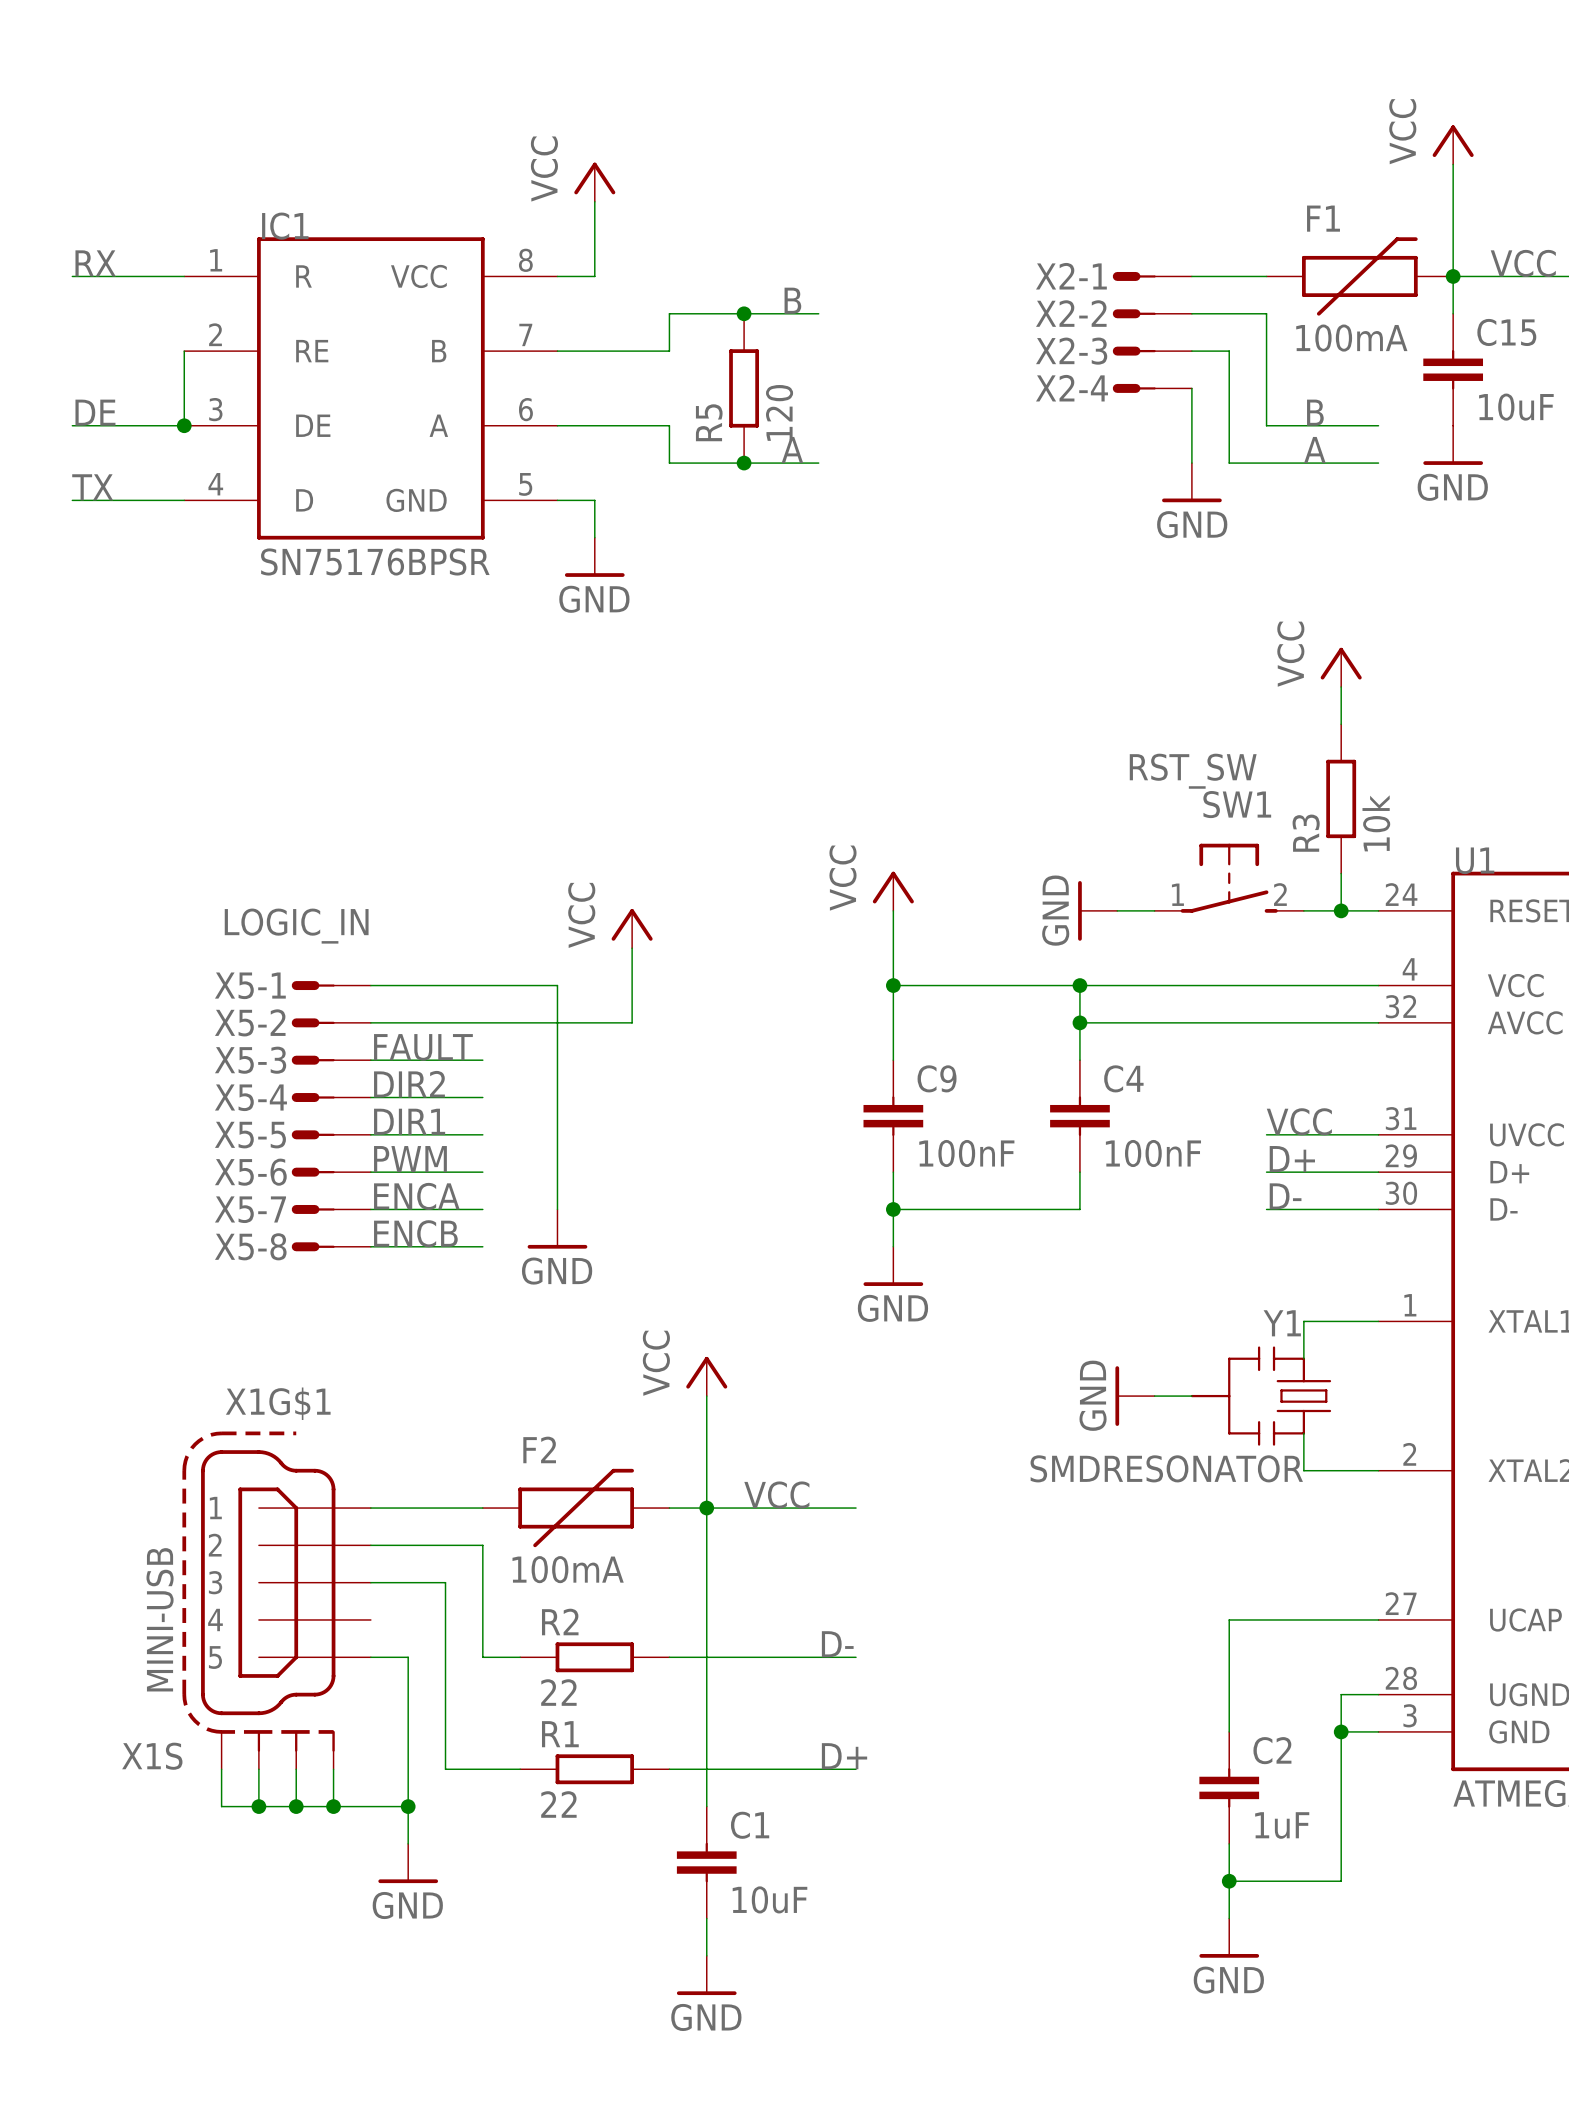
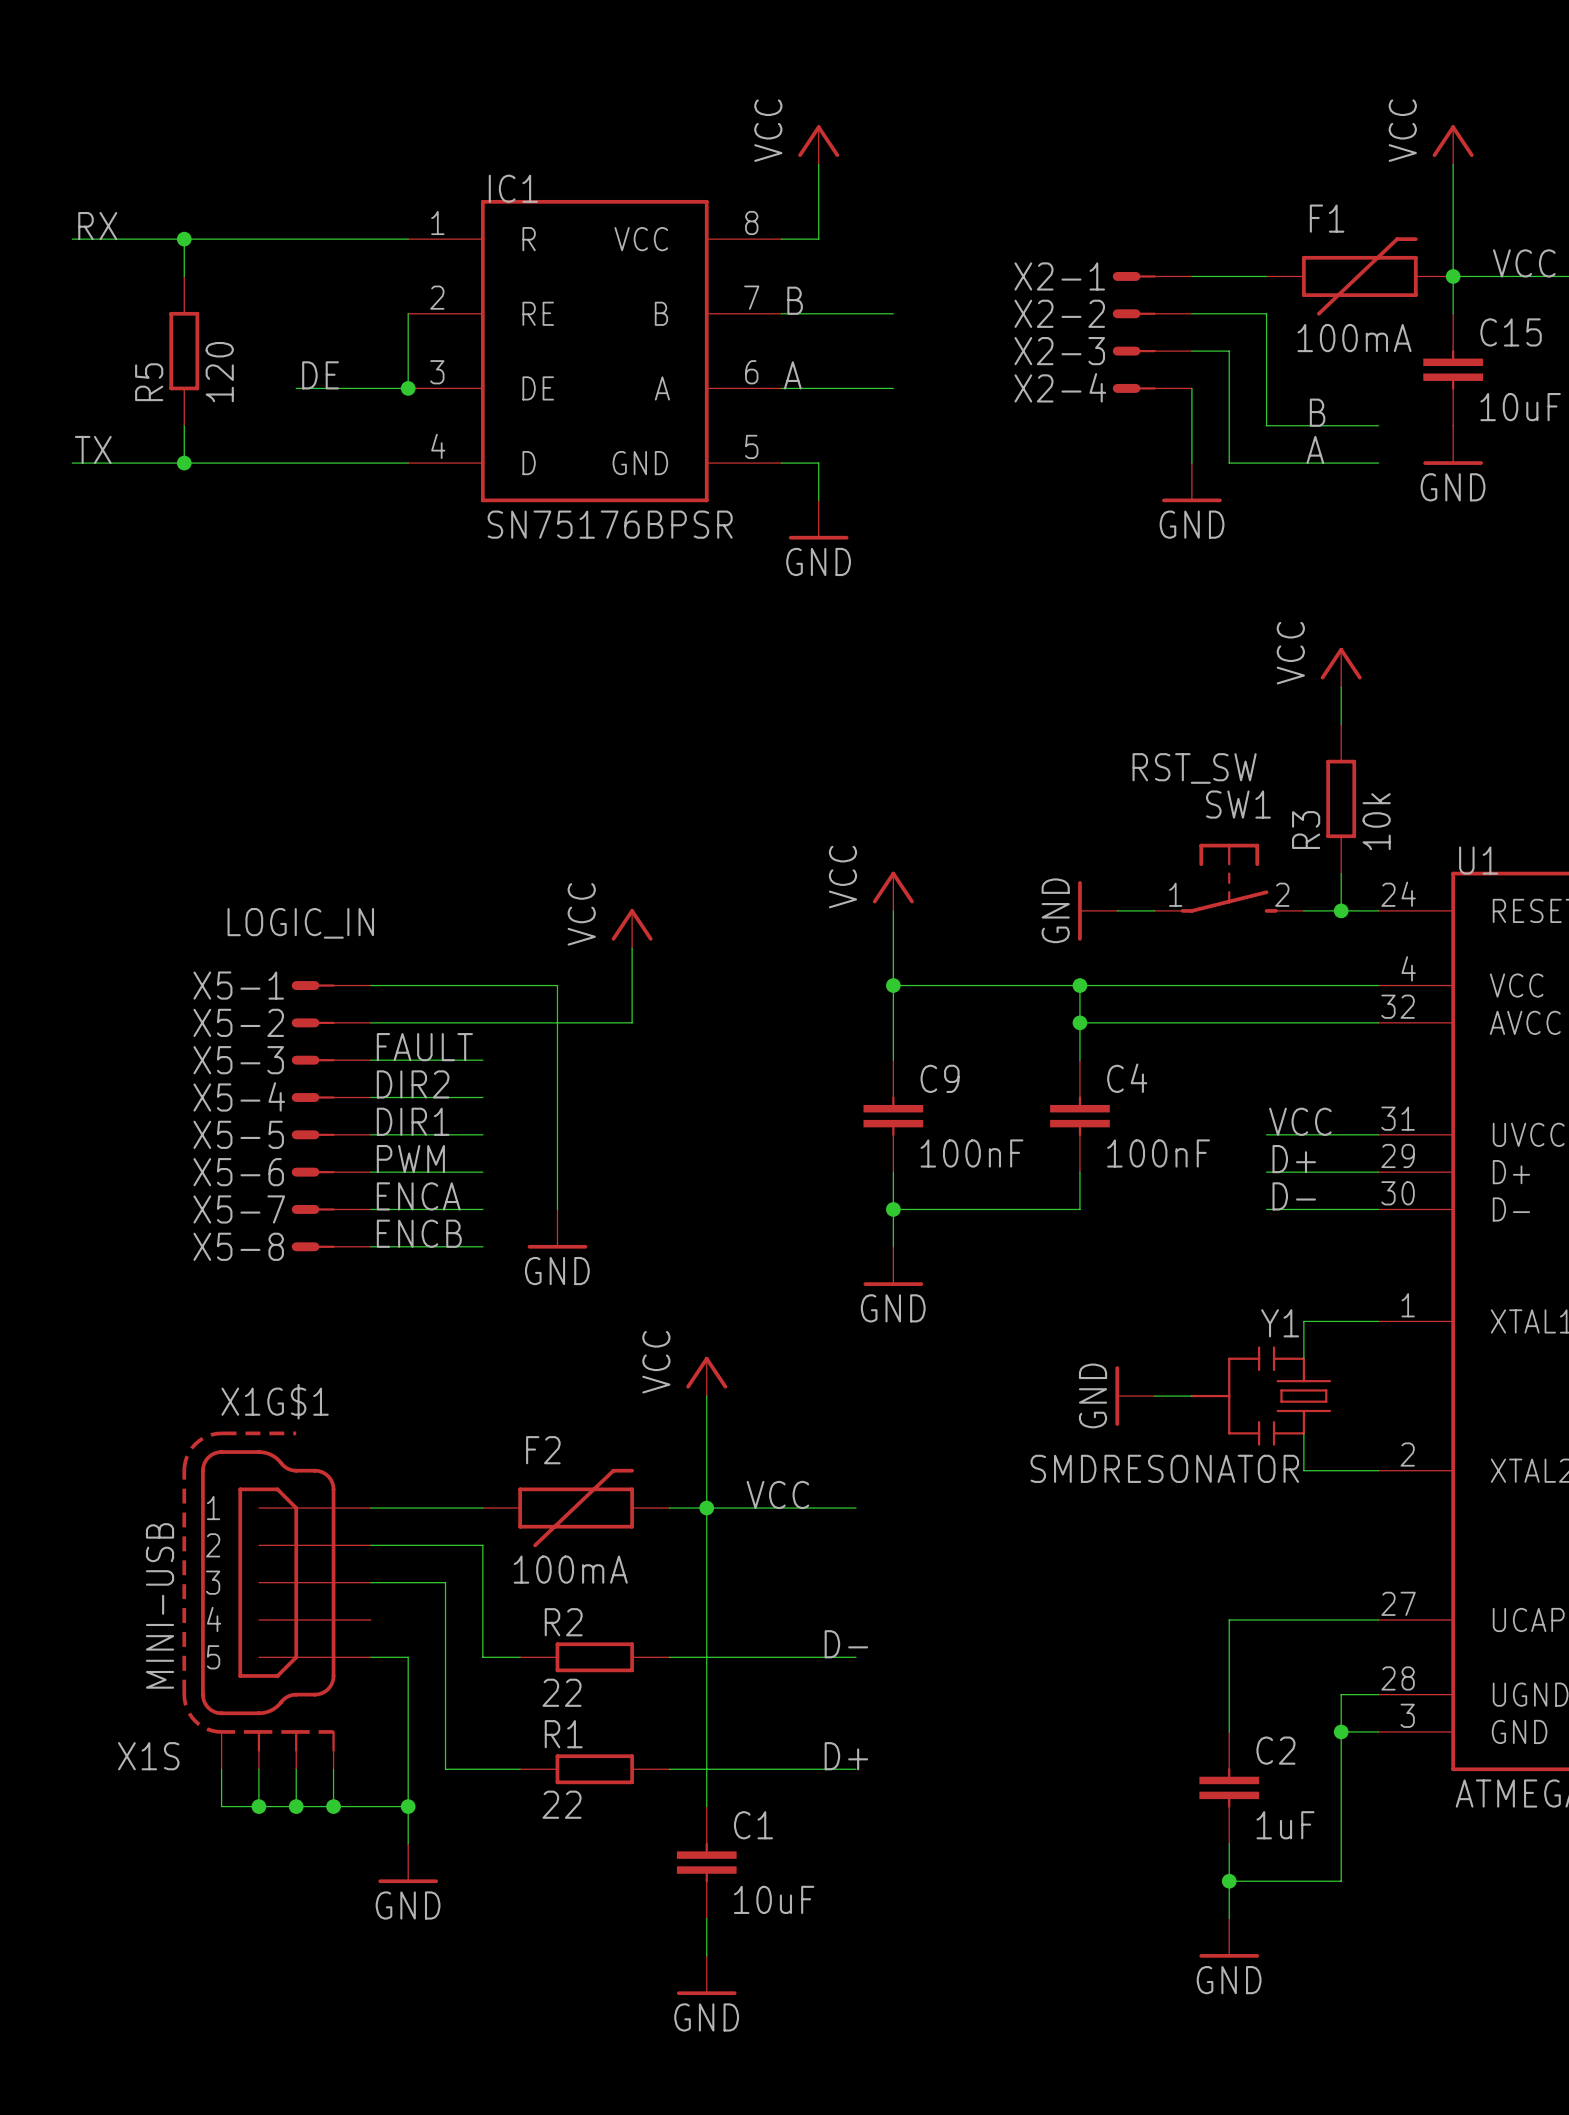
power symbol position: VCC (594, 182) -> VCC (818, 144)
wire: (594, 201) (594, 276) (557, 276) -> (818, 164) (818, 239) (781, 239)
wire: none -> (72, 239) (408, 239)
junction: none -> (184, 239)
label position: RX (95, 263) -> RX (97, 226)
wire: (72, 276) (184, 276) -> (184, 239) (184, 276)
junction: (744, 313) -> none
wire: (781, 313) (669, 313) (669, 351) (557, 351) -> none
wire: none -> (818, 313) (893, 313)
wire: (184, 351) (184, 425) (72, 425) -> (408, 313) (408, 388) (296, 388)
IC1 position: (370, 388) -> (594, 351)
junction: none -> (408, 388)
R5 position: (744, 388) -> (184, 351)
wire: none -> (781, 388) (893, 388)
label position: DE (95, 412) -> DE (320, 375)
wire: none -> (184, 425) (184, 463)
junction position: (184, 425) -> (184, 463)
wire: (557, 425) (669, 425) (669, 463) (781, 463) -> none
label position: A (792, 450) -> A (792, 375)
wire: none -> (72, 463) (408, 463)
junction: (744, 463) -> none
wire: none -> (818, 463) (818, 500)
label position: TX (92, 487) -> TX (93, 450)
wire: (72, 500) (184, 500) -> none
wire: (557, 500) (594, 500) (594, 537) -> none
power symbol position: GND (594, 557) -> GND (818, 519)

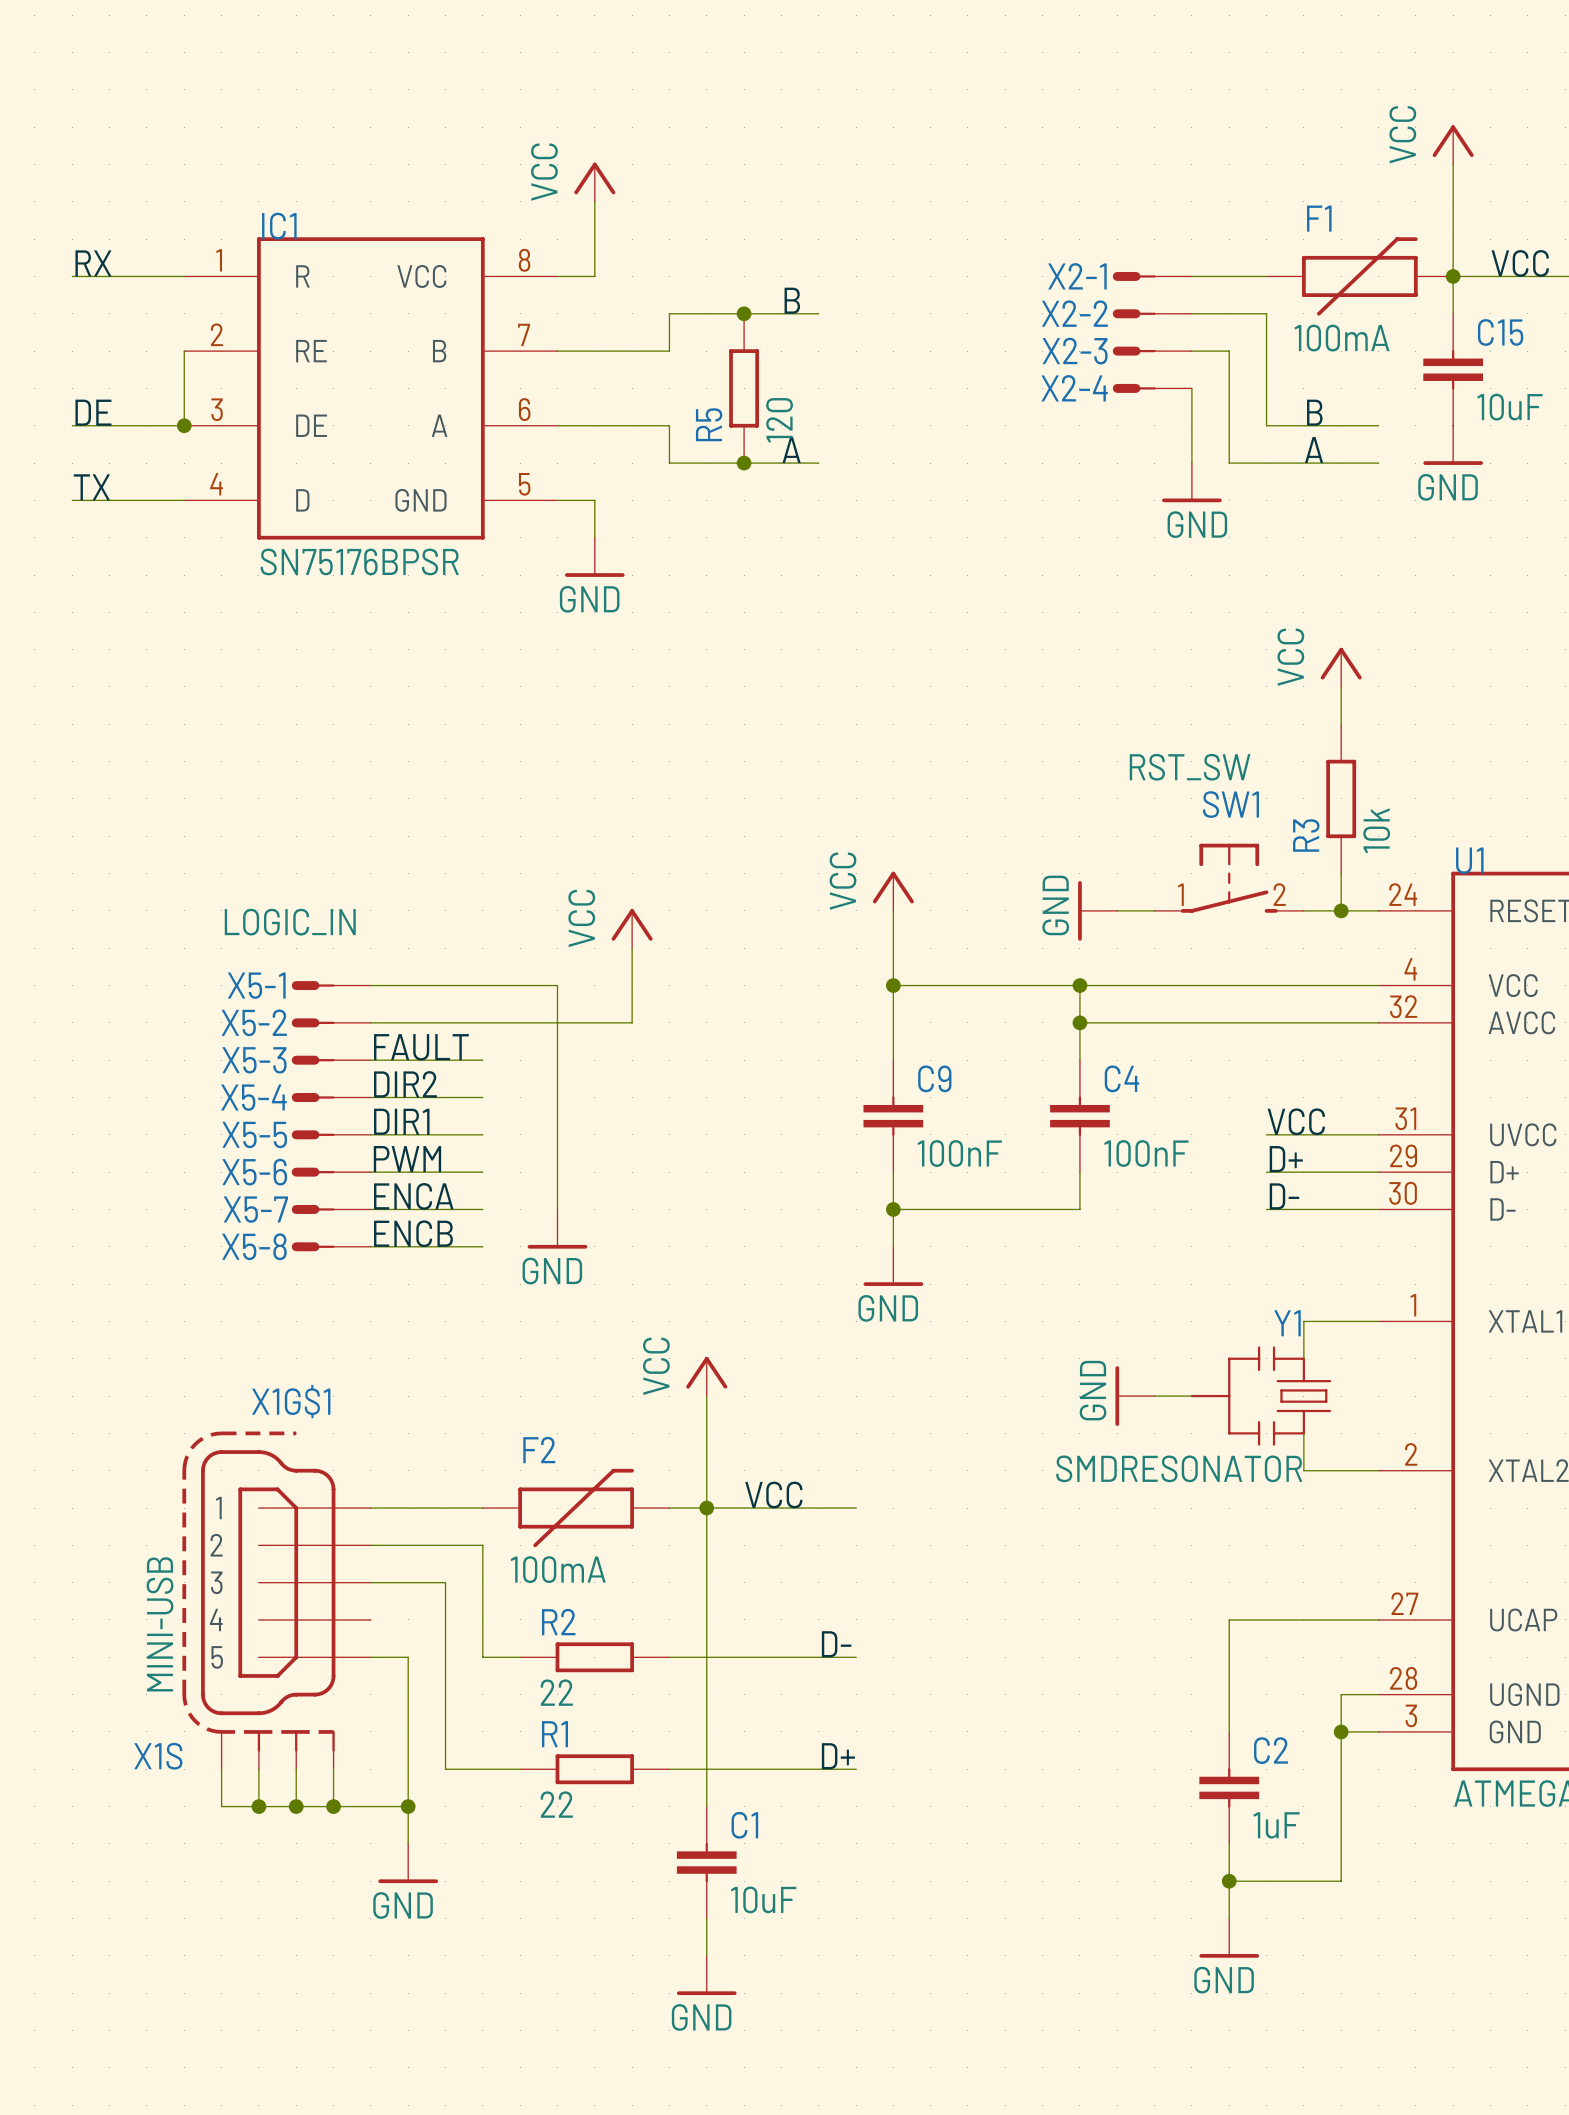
power symbol position: VCC (818, 144) -> VCC (594, 182)
wire: (818, 164) (818, 239) (781, 239) -> (594, 201) (594, 276) (557, 276)
label position: RX (97, 226) -> RX (93, 263)
wire: (72, 239) (408, 239) -> none
wire: (184, 239) (184, 276) -> (72, 276) (184, 276)
junction: (184, 239) -> none
wire: (408, 313) (408, 388) (296, 388) -> (184, 351) (184, 425) (72, 425)
junction: none -> (744, 313)
wire: none -> (781, 313) (669, 313) (669, 351) (557, 351)
wire: (818, 313) (893, 313) -> none
R5 position: (184, 351) -> (744, 388)
IC1 position: (594, 351) -> (370, 388)
label position: DE (320, 375) -> DE (93, 412)
label position: A (792, 375) -> A (791, 450)
junction: (408, 388) -> none
wire: (781, 388) (893, 388) -> none
wire: (184, 425) (184, 463) -> none
wire: none -> (557, 425) (669, 425) (669, 463) (781, 463)
label position: TX (93, 450) -> TX (91, 487)
wire: (72, 463) (408, 463) -> none
junction position: (184, 463) -> (184, 425)
junction: none -> (744, 463)
wire: (818, 463) (818, 500) -> none
wire: none -> (72, 500) (184, 500)
wire: none -> (557, 500) (594, 500) (594, 537)
power symbol position: GND (818, 519) -> GND (594, 557)

